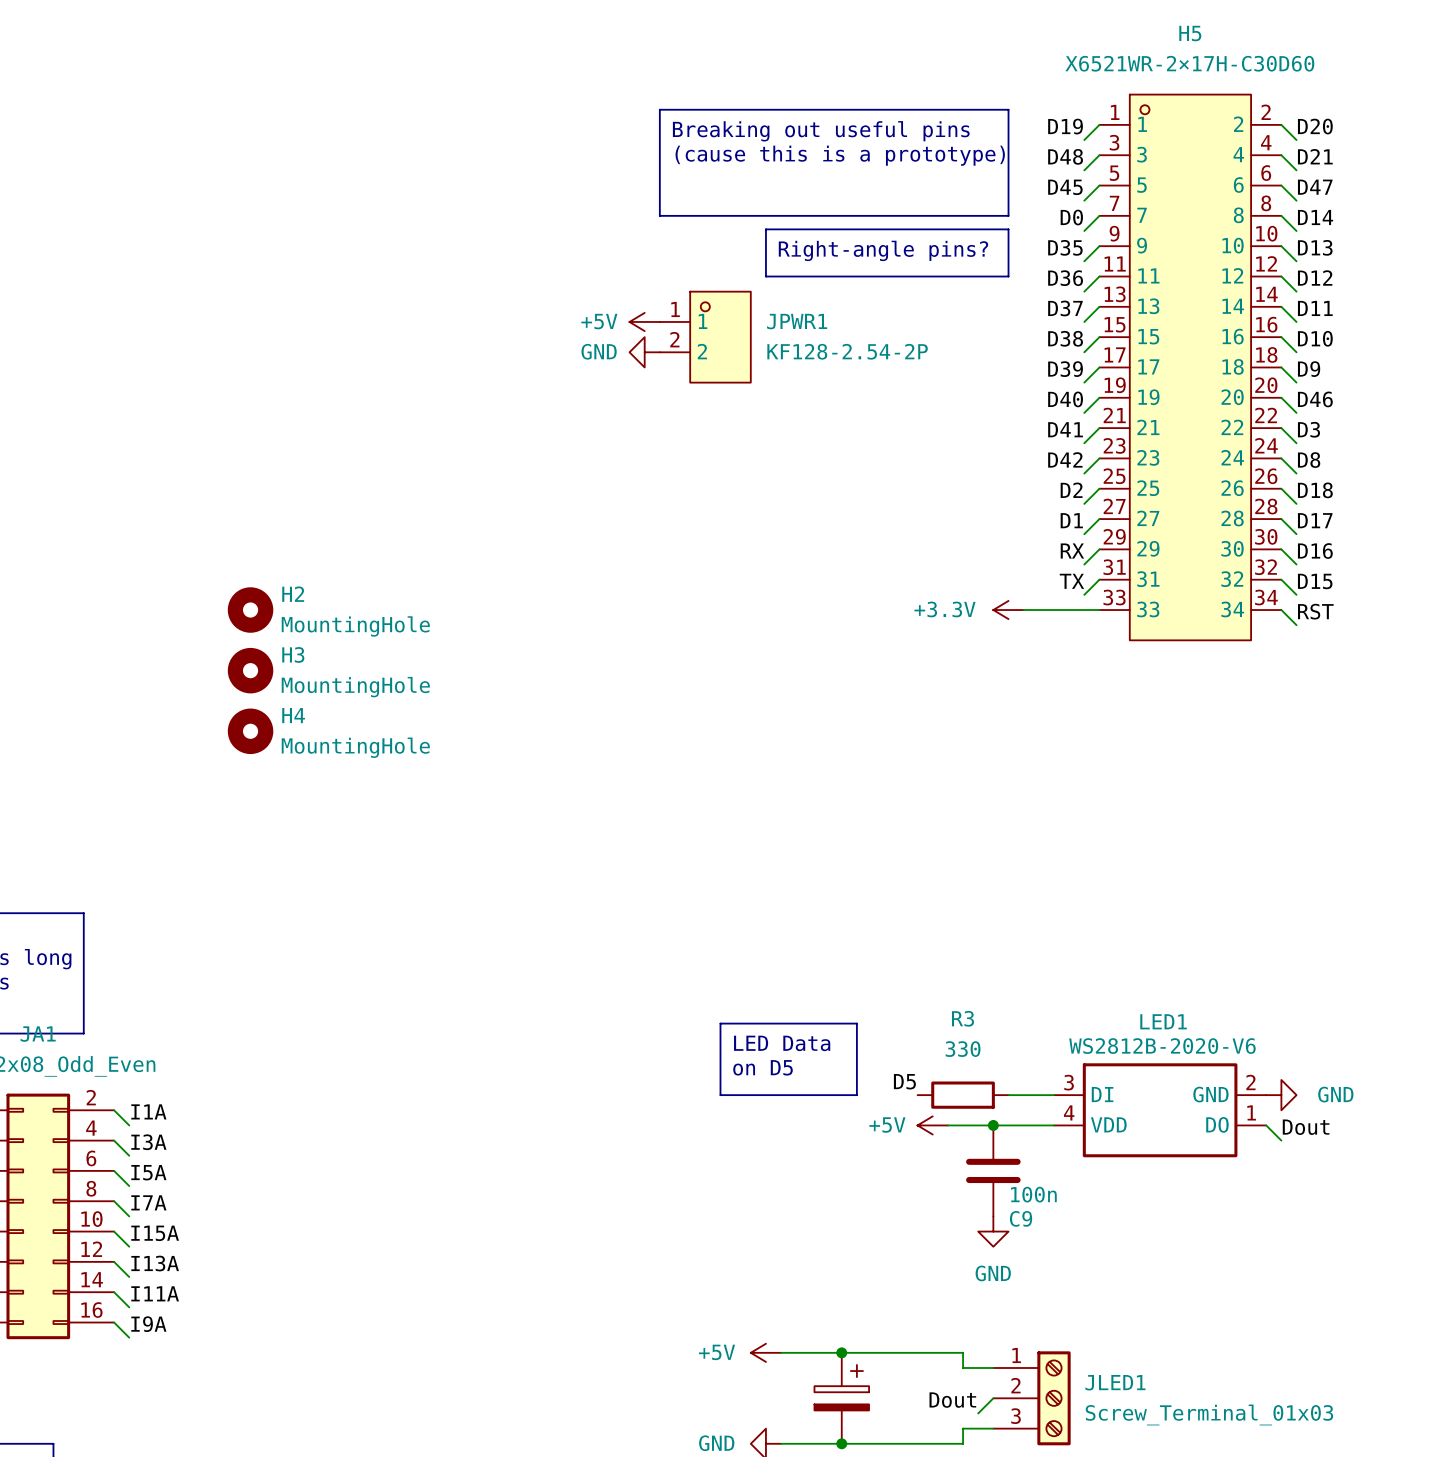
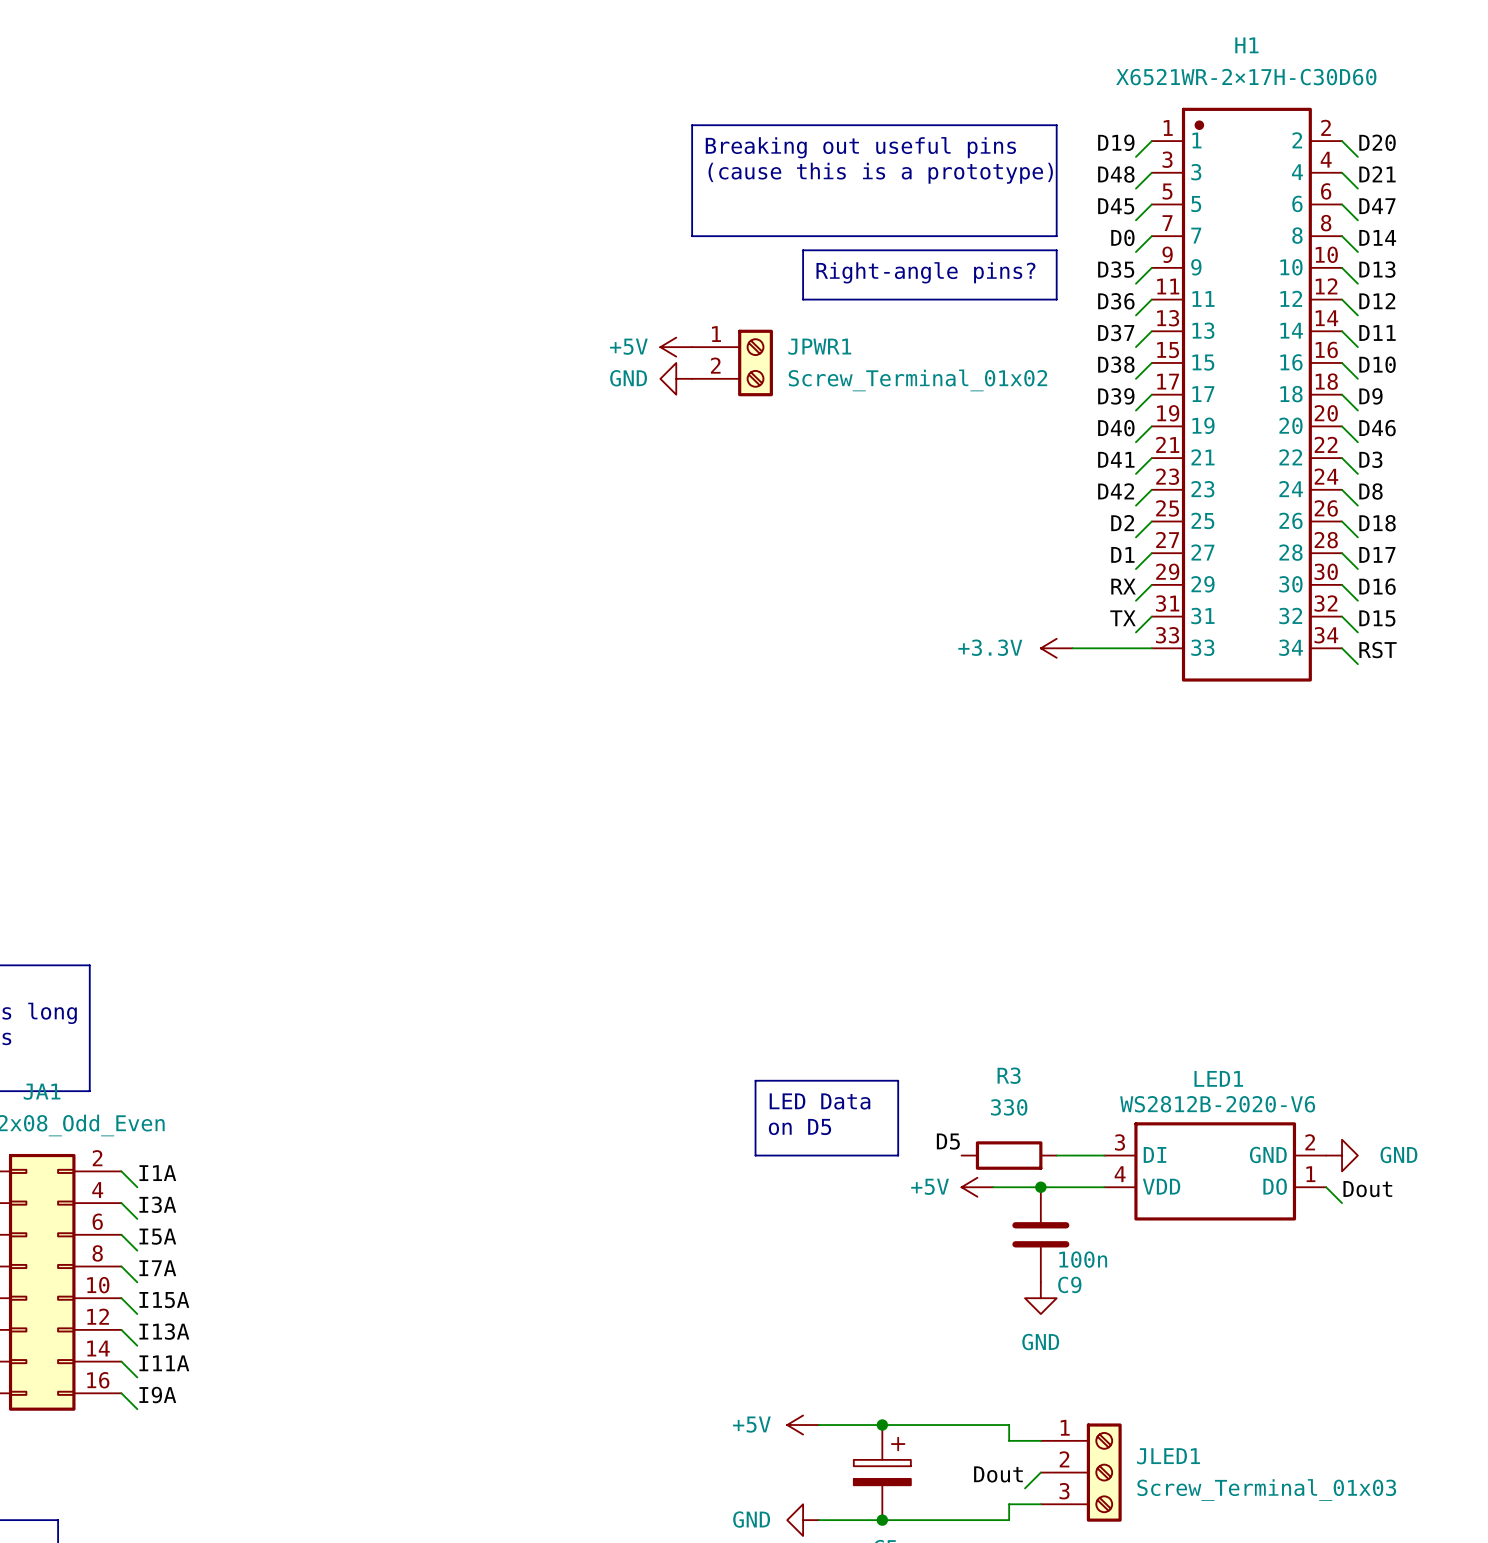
JPWR1 symbol: [659, 291, 751, 383] -> [692, 329, 773, 397]
JPWR1 value: KF128-2.54-2P (847, 351) -> Screw_Terminal_01x02 (917, 380)
H5: X6521WR-2×17H-C30D60 (1190, 367) -> none
H1: none -> X6521WR-2×17H-C30D60 (1246, 394)
H2: MountingHole (250, 610) -> none
H3: MountingHole (250, 670) -> none
H4: MountingHole (250, 731) -> none

